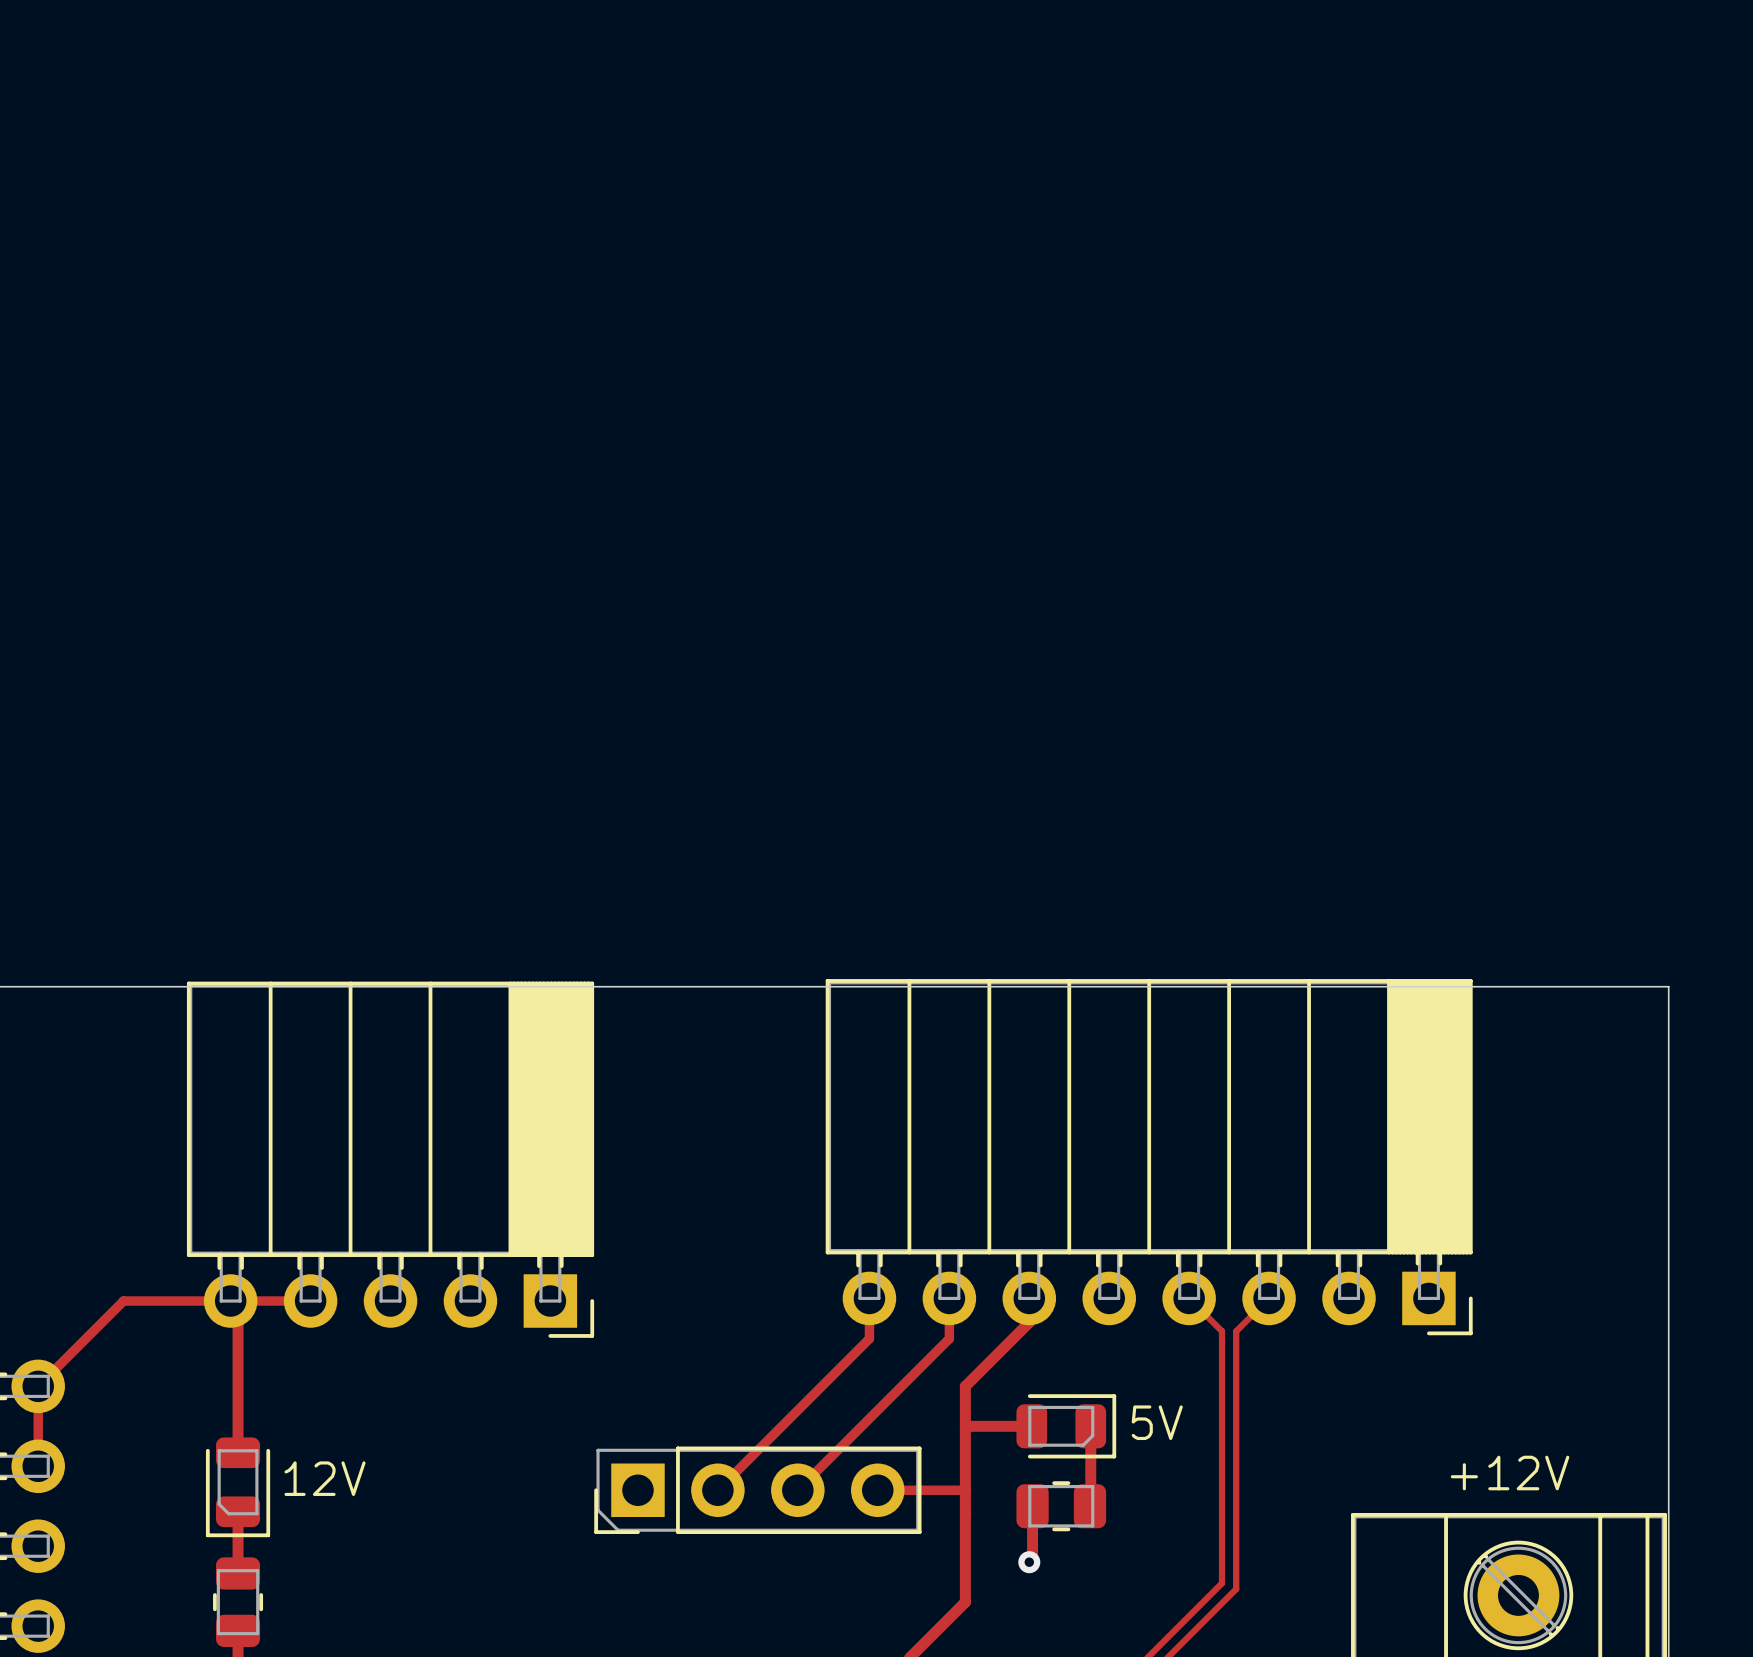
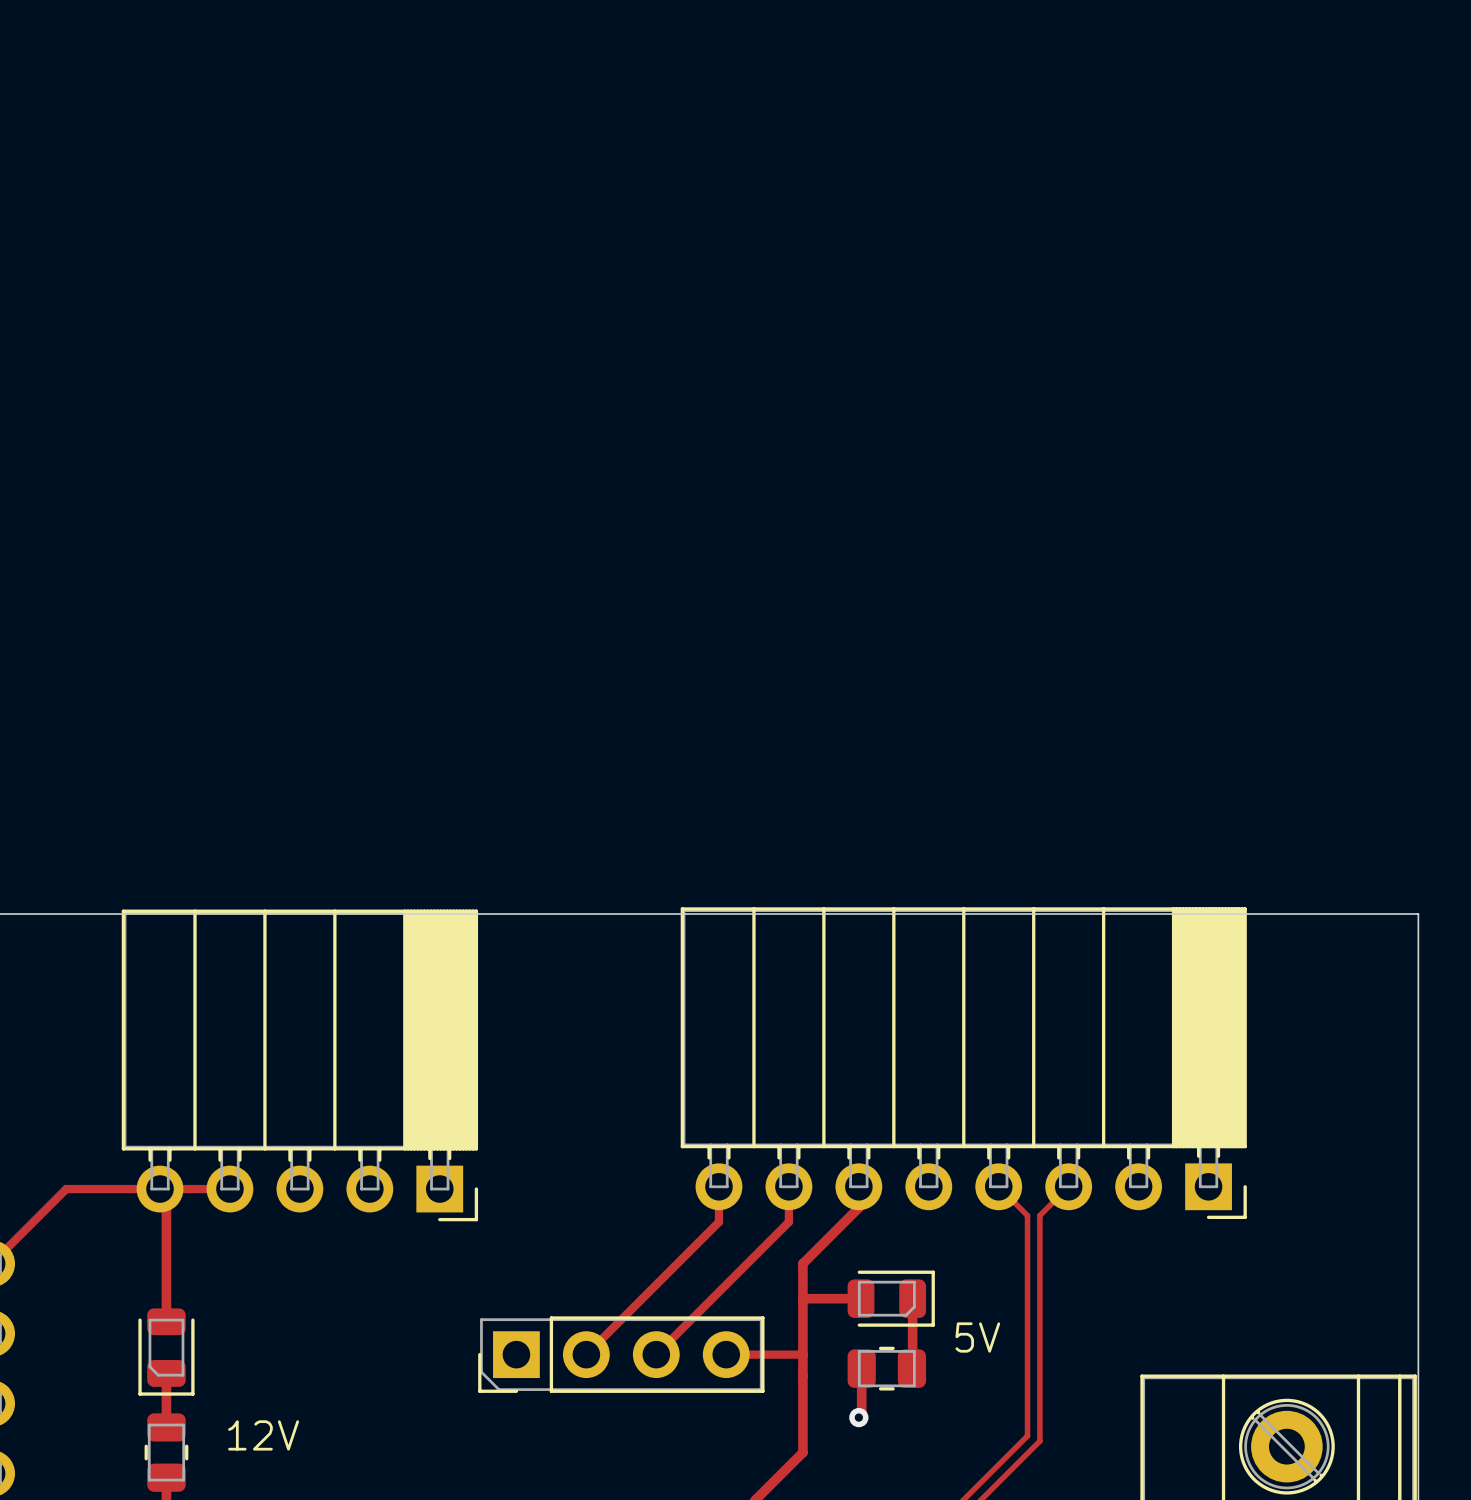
text position: 5V (1157, 1422) -> 5V (977, 1337)
text: +12V (1510, 1473) -> none
text position: 12V (325, 1478) -> 12V (263, 1435)

